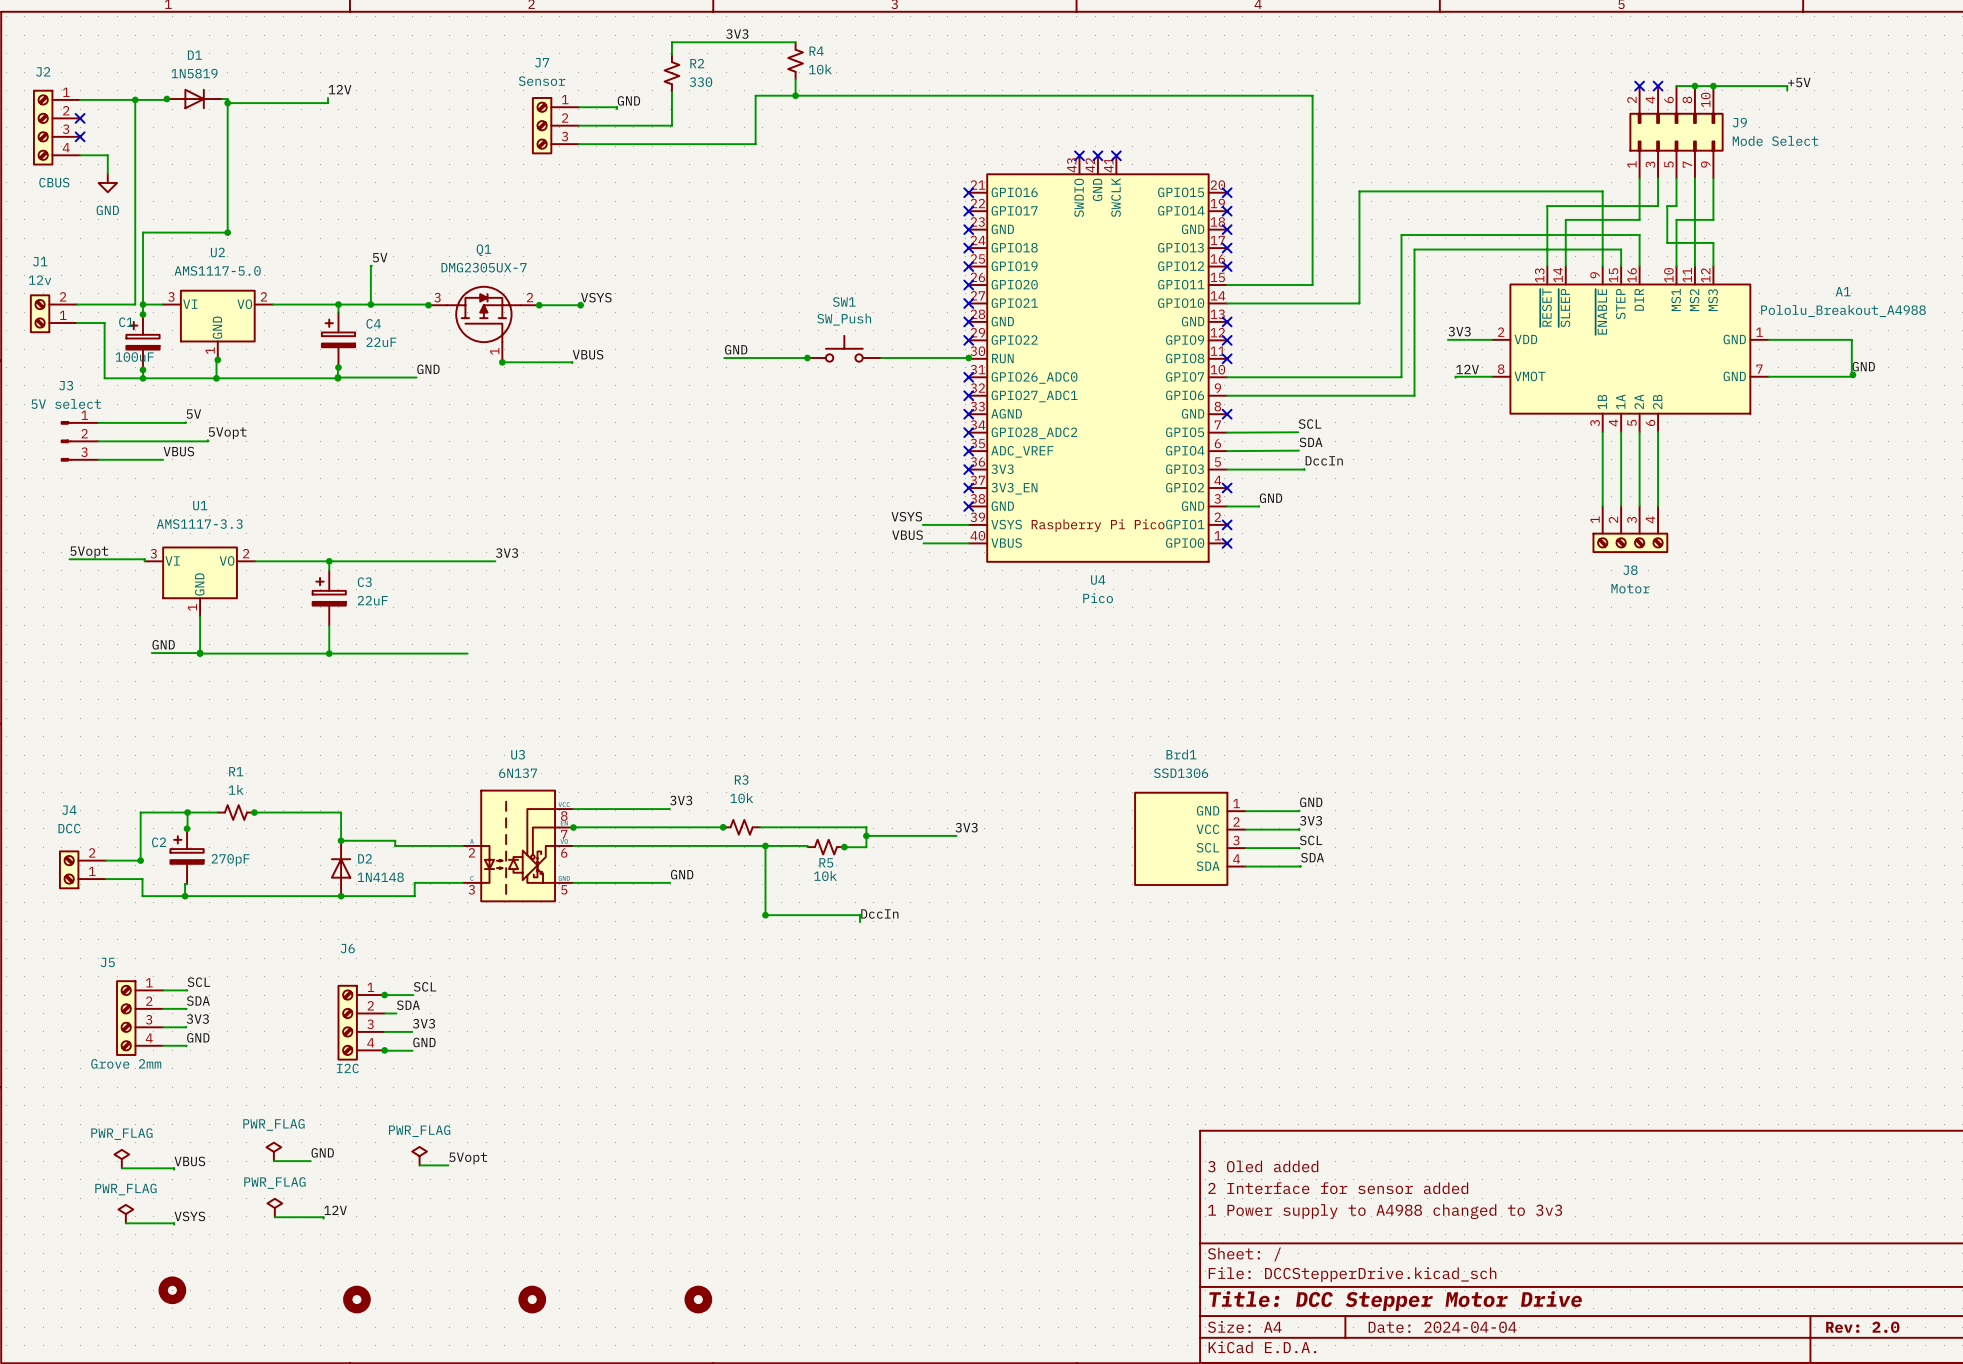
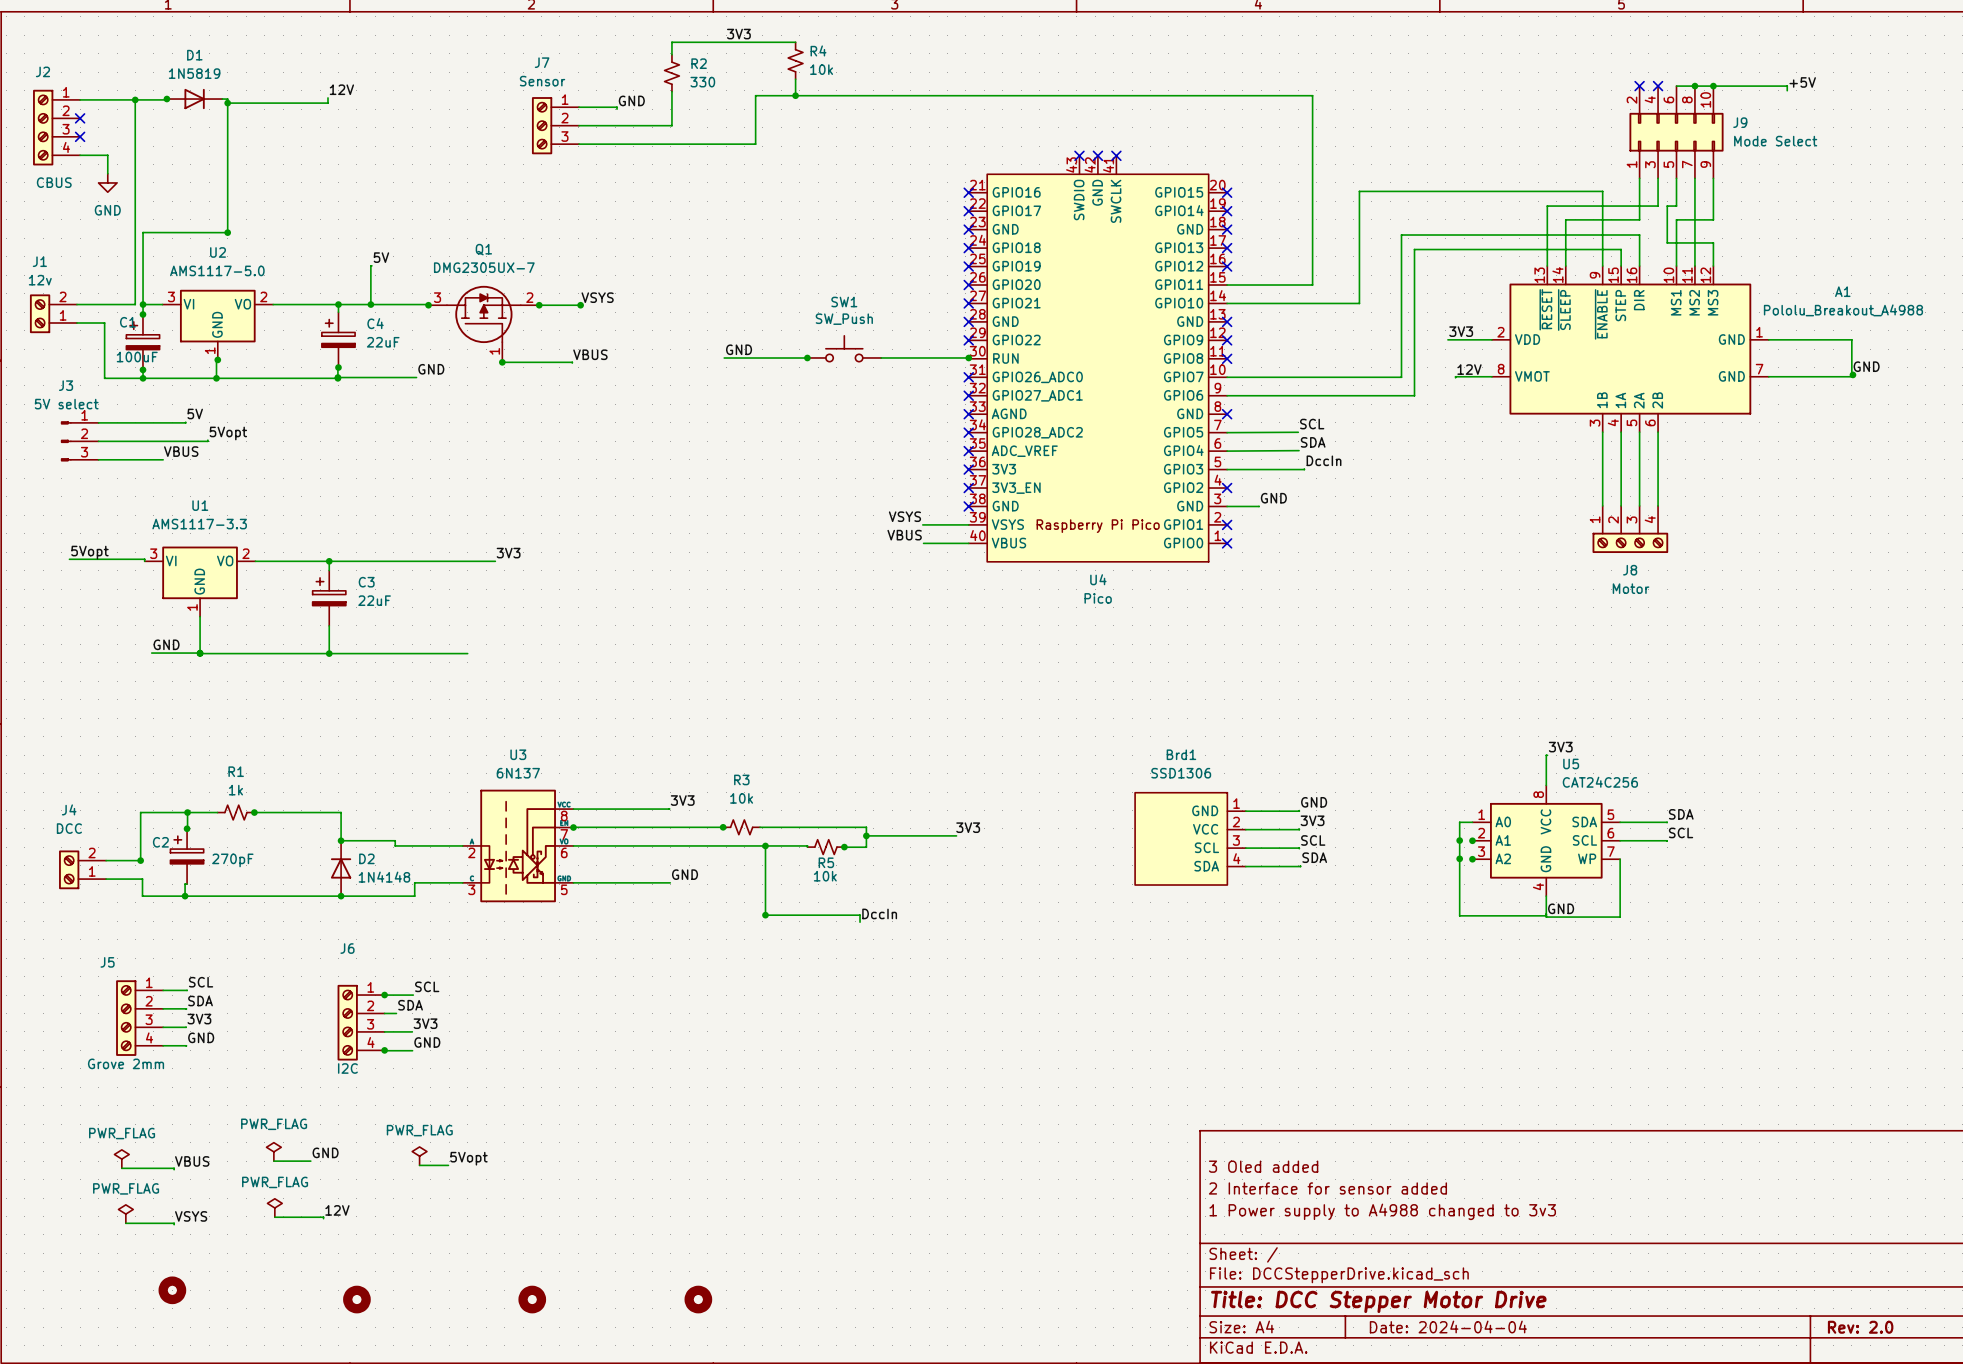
label: none -> 3V3 (1560, 747)
wire: none -> (1547, 755) (1546, 785)
label: none -> SDA (1681, 814)
wire: none -> (1472, 822) (1459, 822) (1459, 915) (1546, 915)
wire: none -> (1620, 822) (1667, 822)
label: none -> SCL (1681, 832)
junction: none -> (1459, 840)
junction: none -> (1472, 840)
U5: none -> CAT24C256 (1546, 840)
wire: none -> (1620, 840) (1667, 841)
junction: none -> (1459, 858)
junction: none -> (1472, 859)
wire: none -> (1620, 859) (1620, 917) (1546, 917) (1546, 896)
label: none -> GND (1561, 908)

